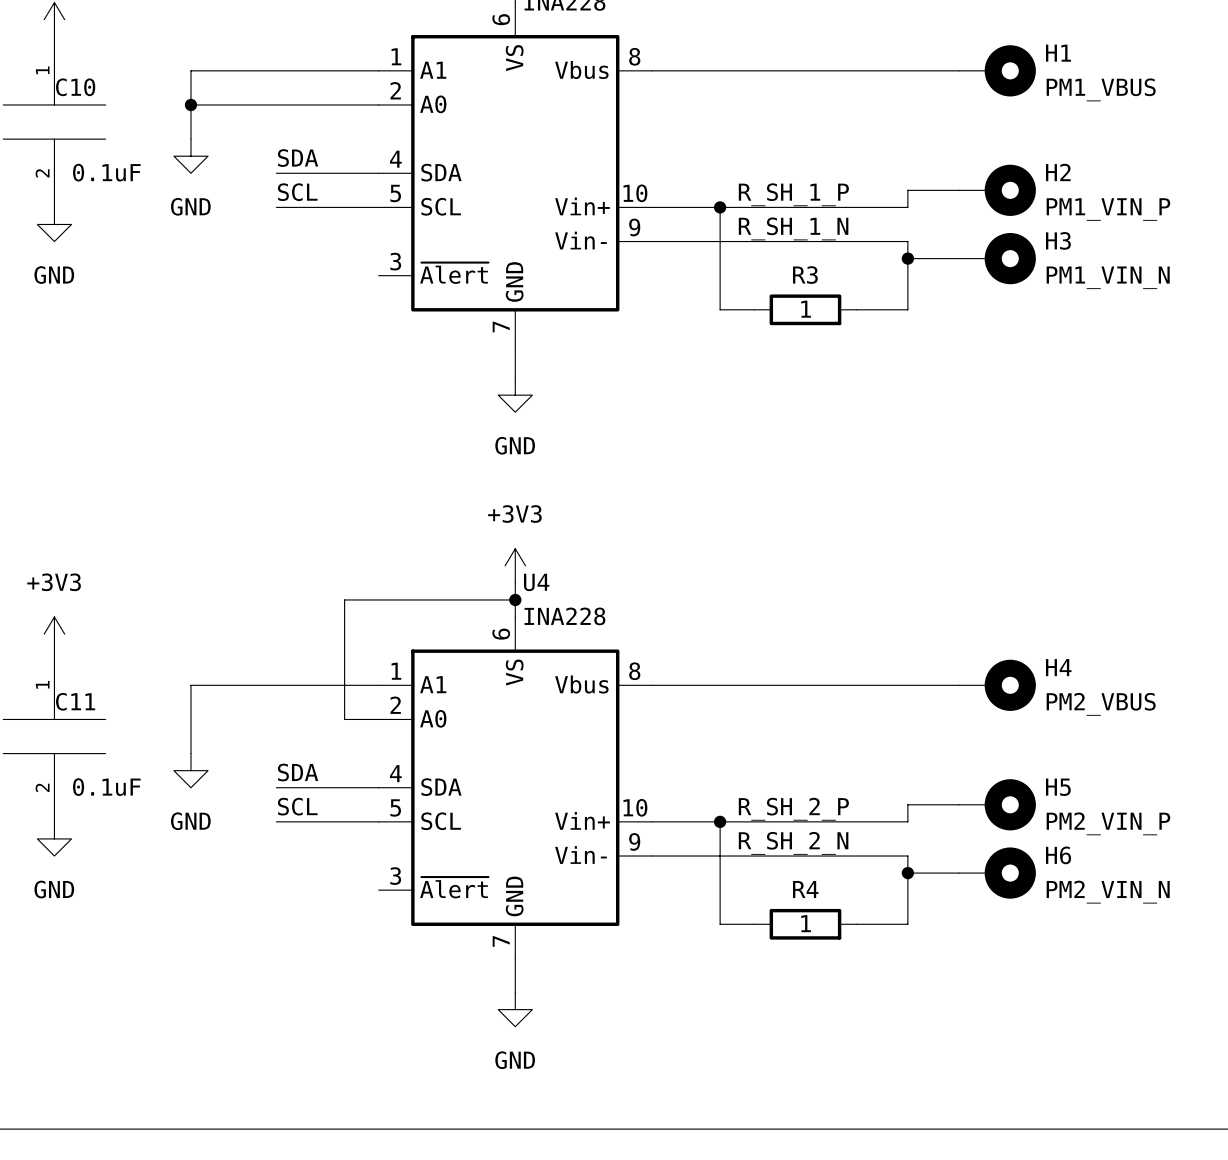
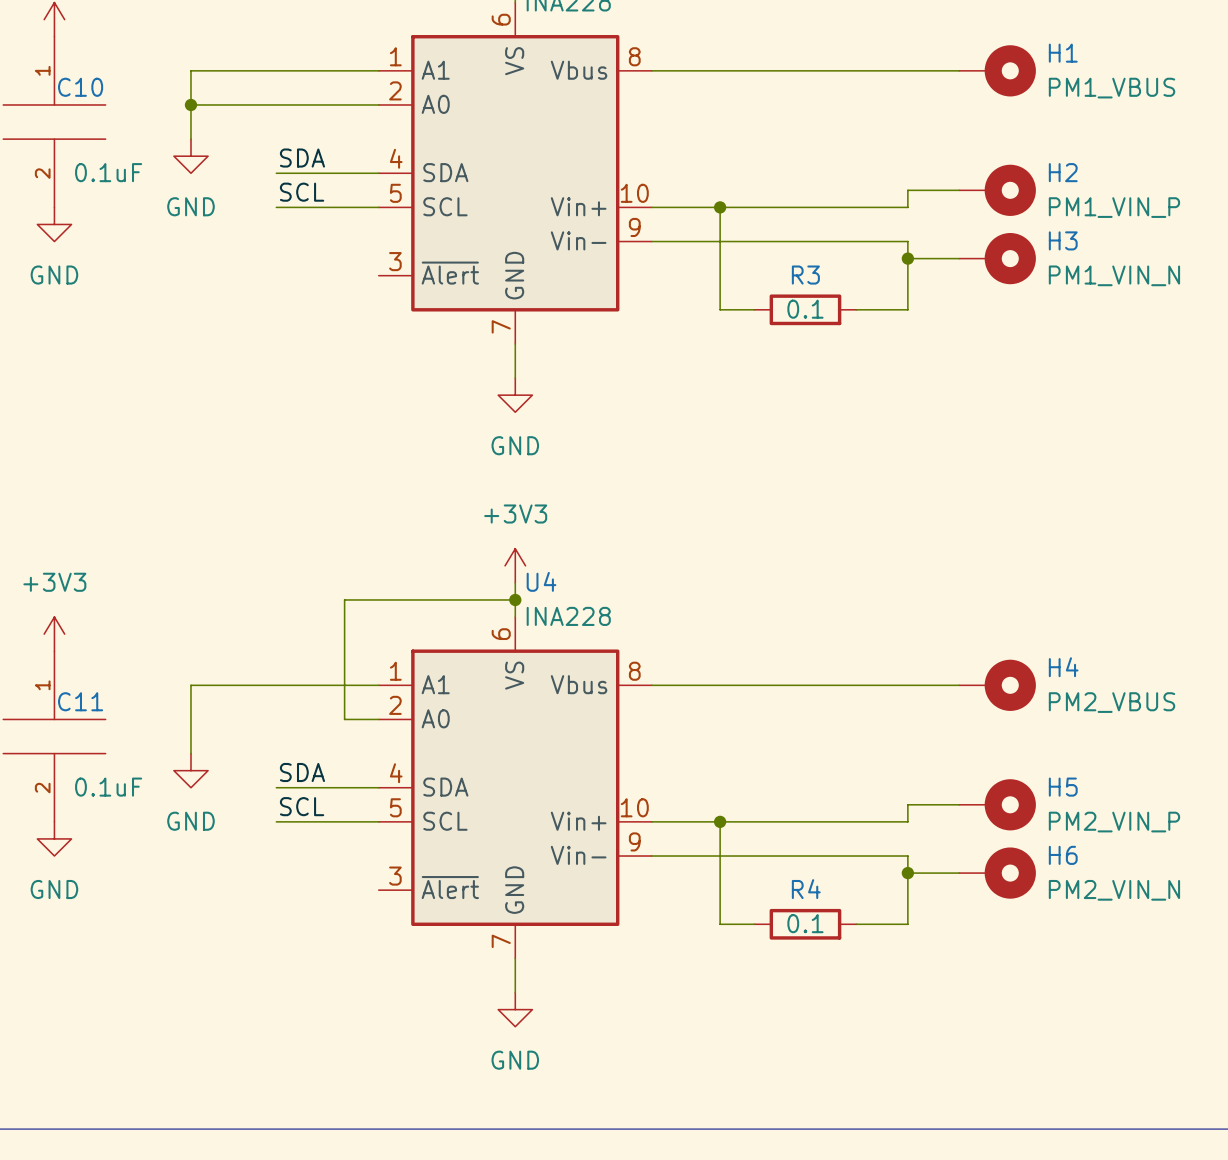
label: R_SH_1_P (793, 194) -> none
label: R_SH_1_N (793, 228) -> none
R3 value: 1 (806, 309) -> 0.1 (805, 309)
label: R_SH_2_P (793, 809) -> none
label: R_SH_2_N (793, 843) -> none
R4 value: 1 (806, 923) -> 0.1 (805, 923)

